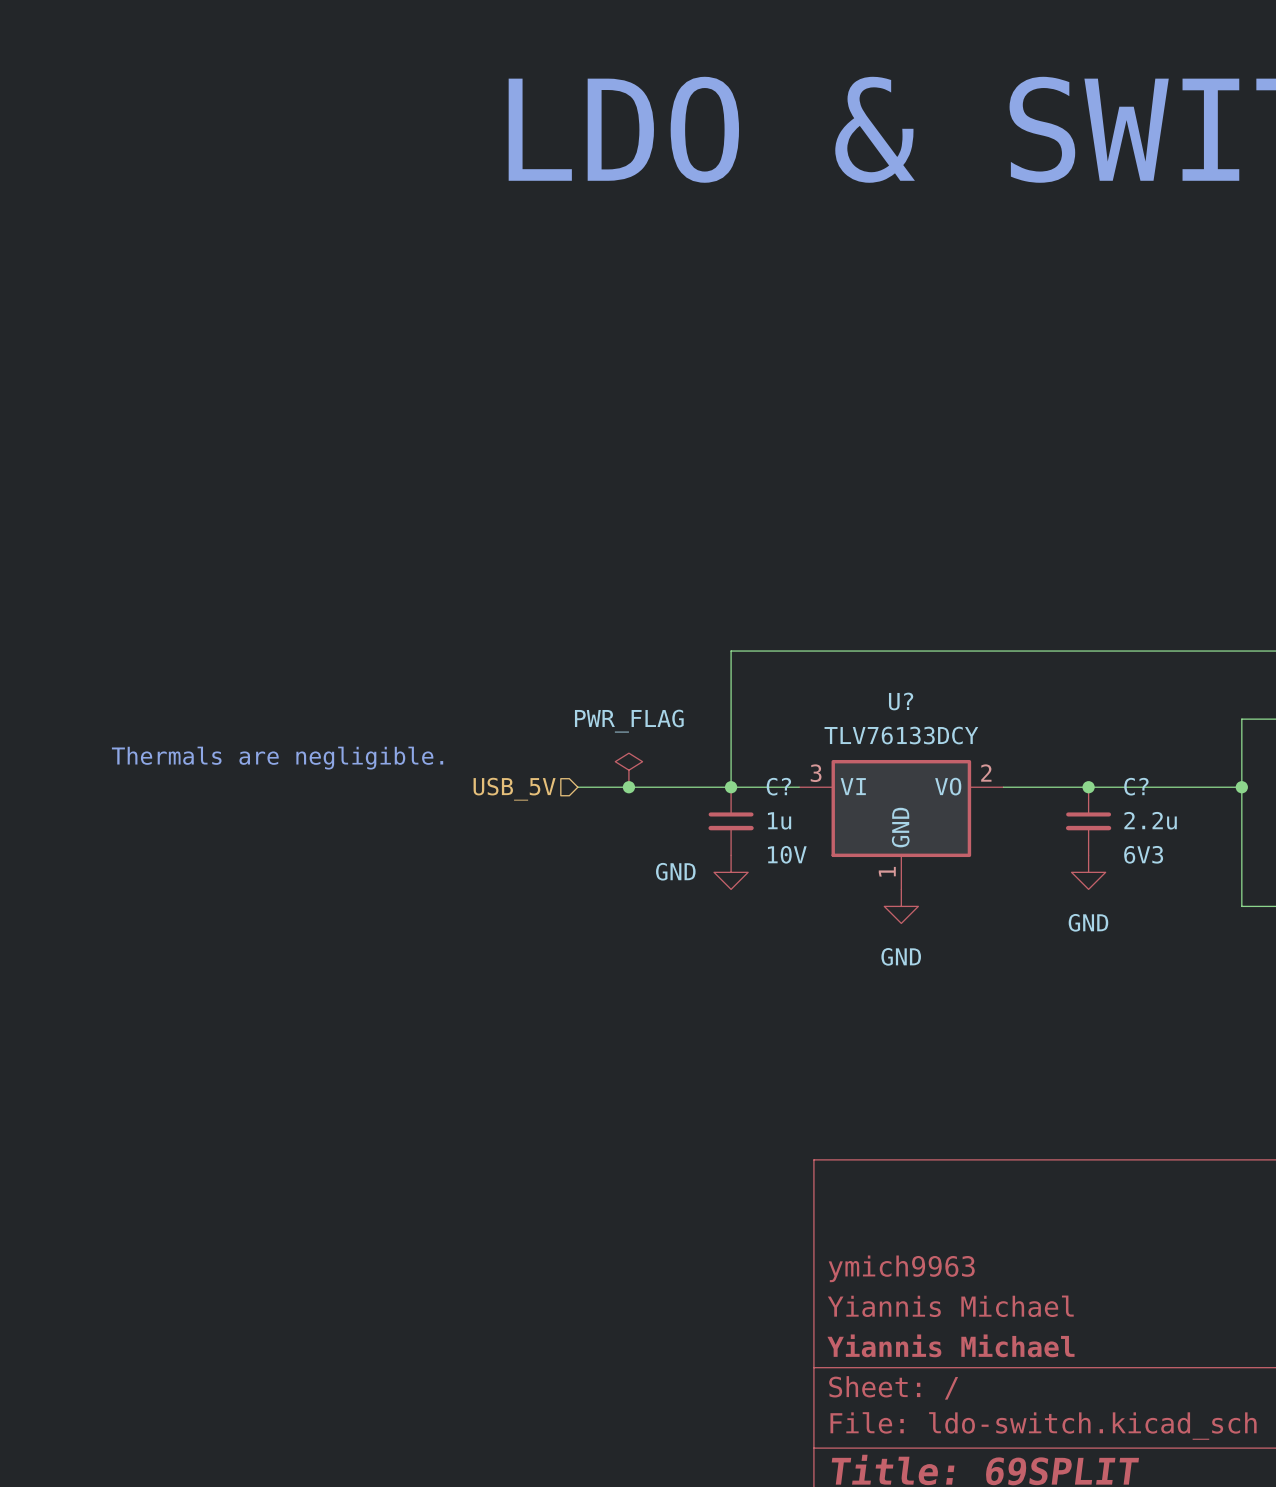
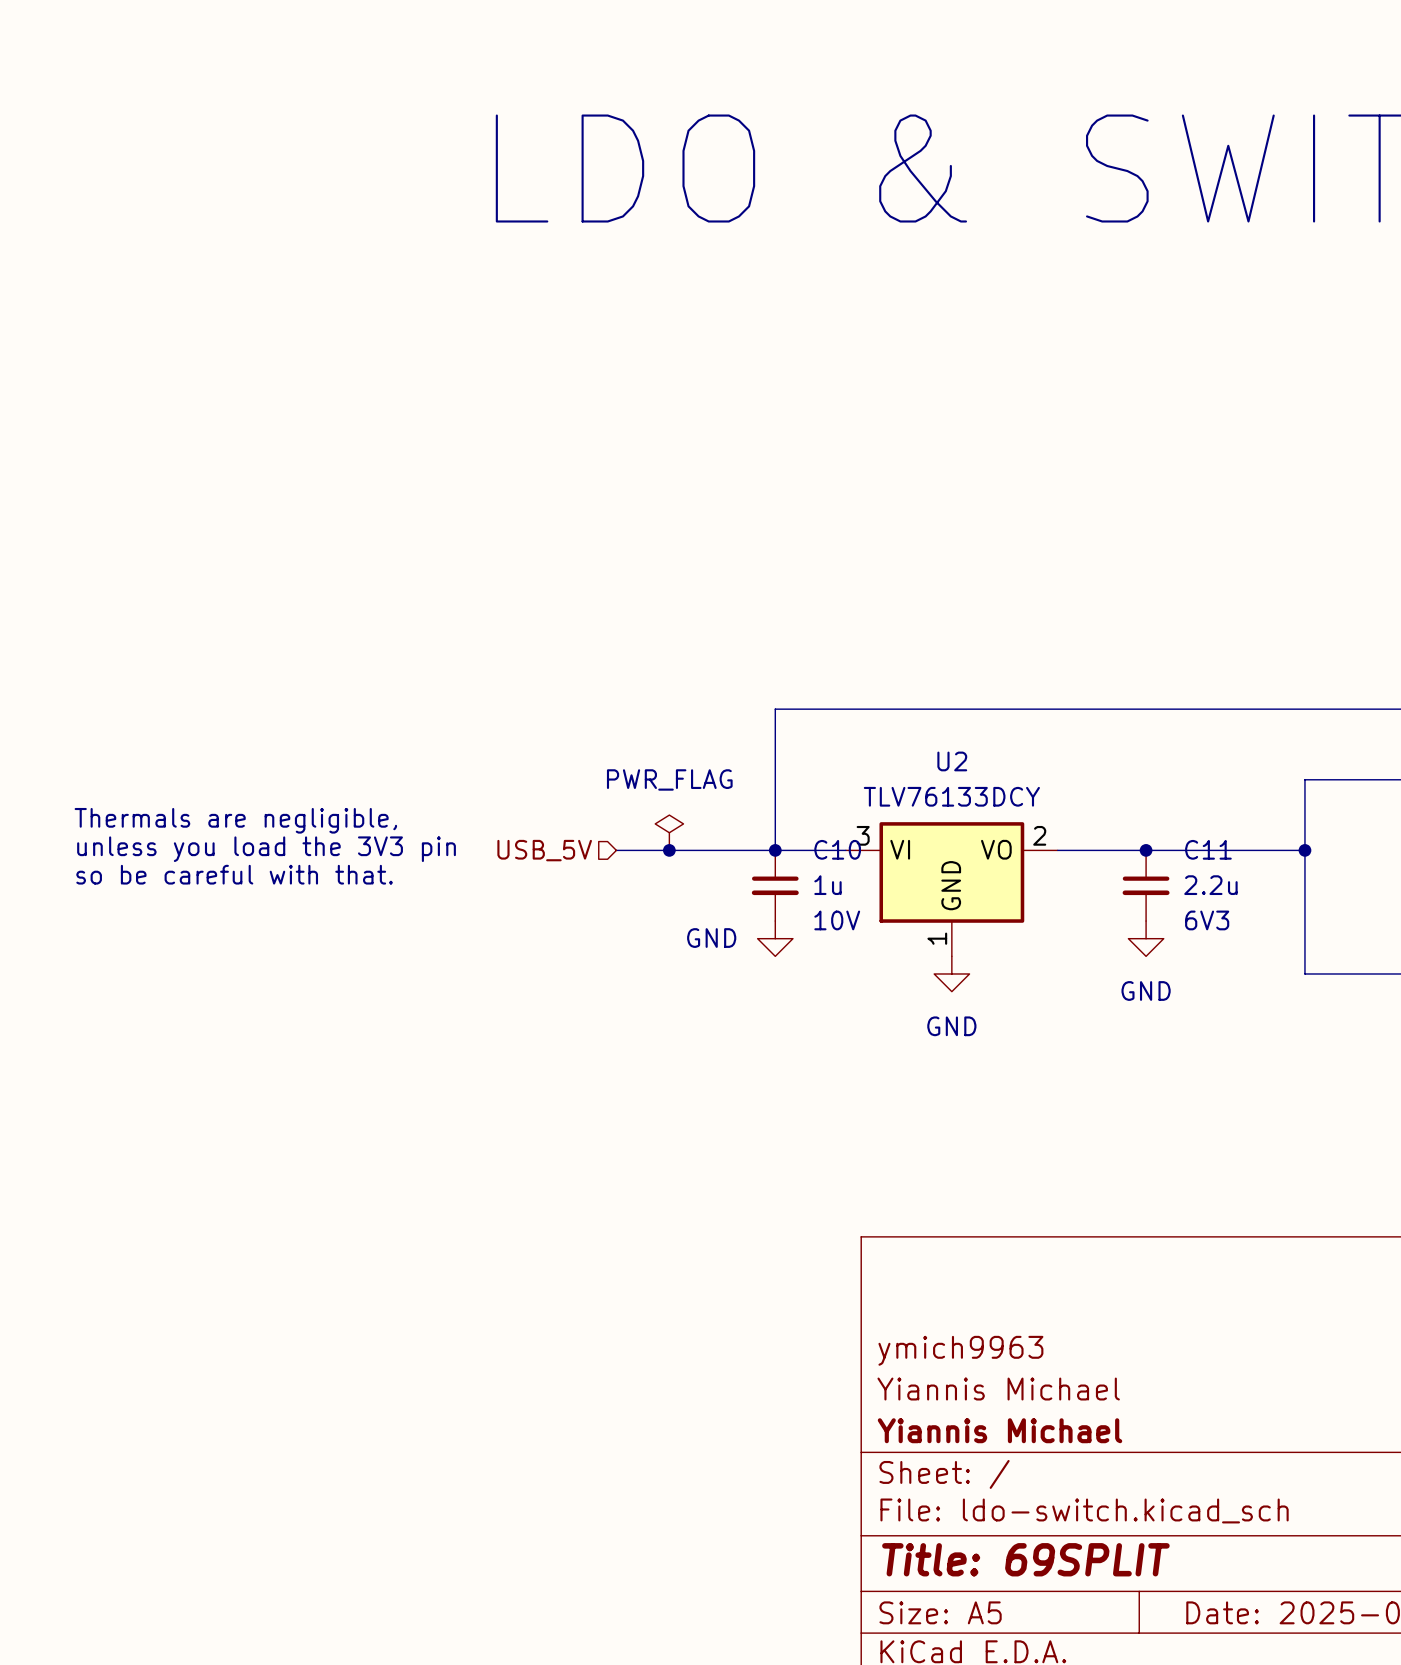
U? name: U? (901, 701) -> U2 (952, 761)
text: Thermals are negligible. (277, 758) -> Thermals are negligible, (235, 820)
text: none -> unless you load the 3V3 pin (266, 849)
C? name: C? (778, 786) -> C10 (837, 849)
C? name: C? (1136, 786) -> C11 (1208, 849)
text: none -> so be careful with that. (234, 874)

